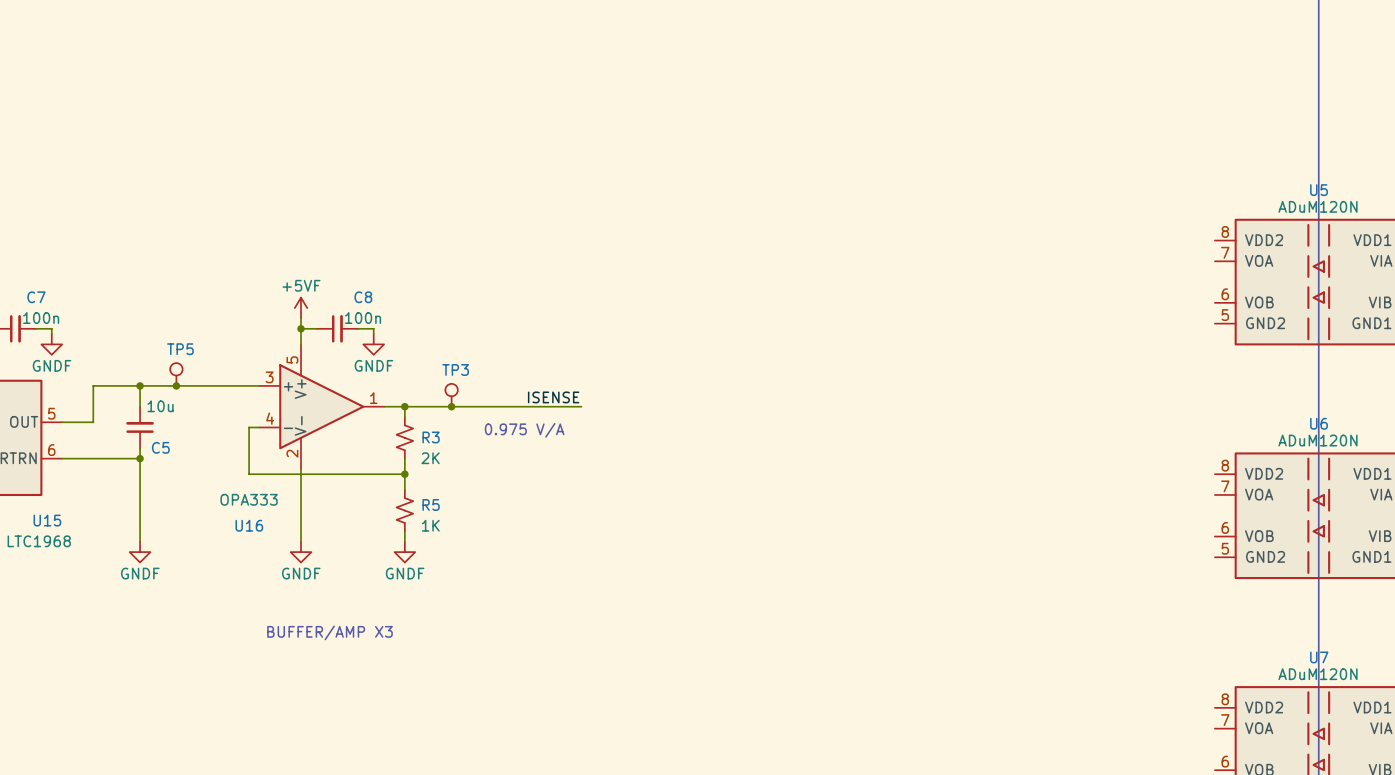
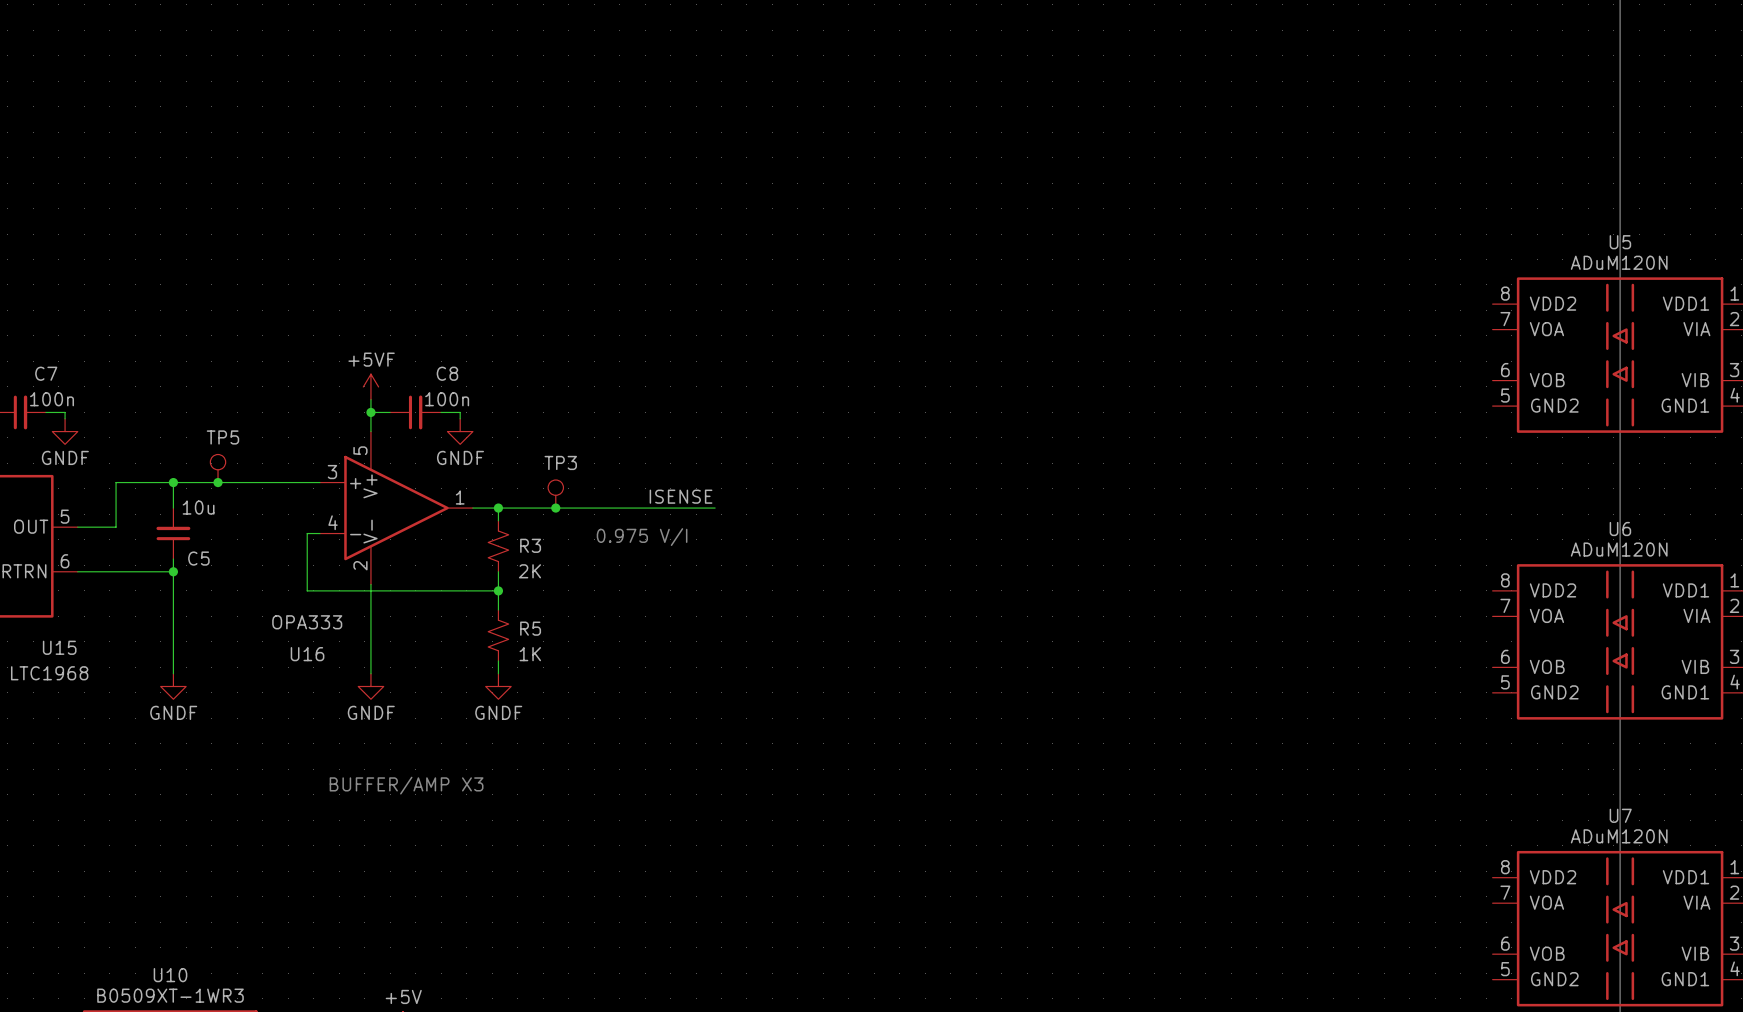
text: 0.975 V/A (524, 430) -> 0.975 V/I (642, 537)

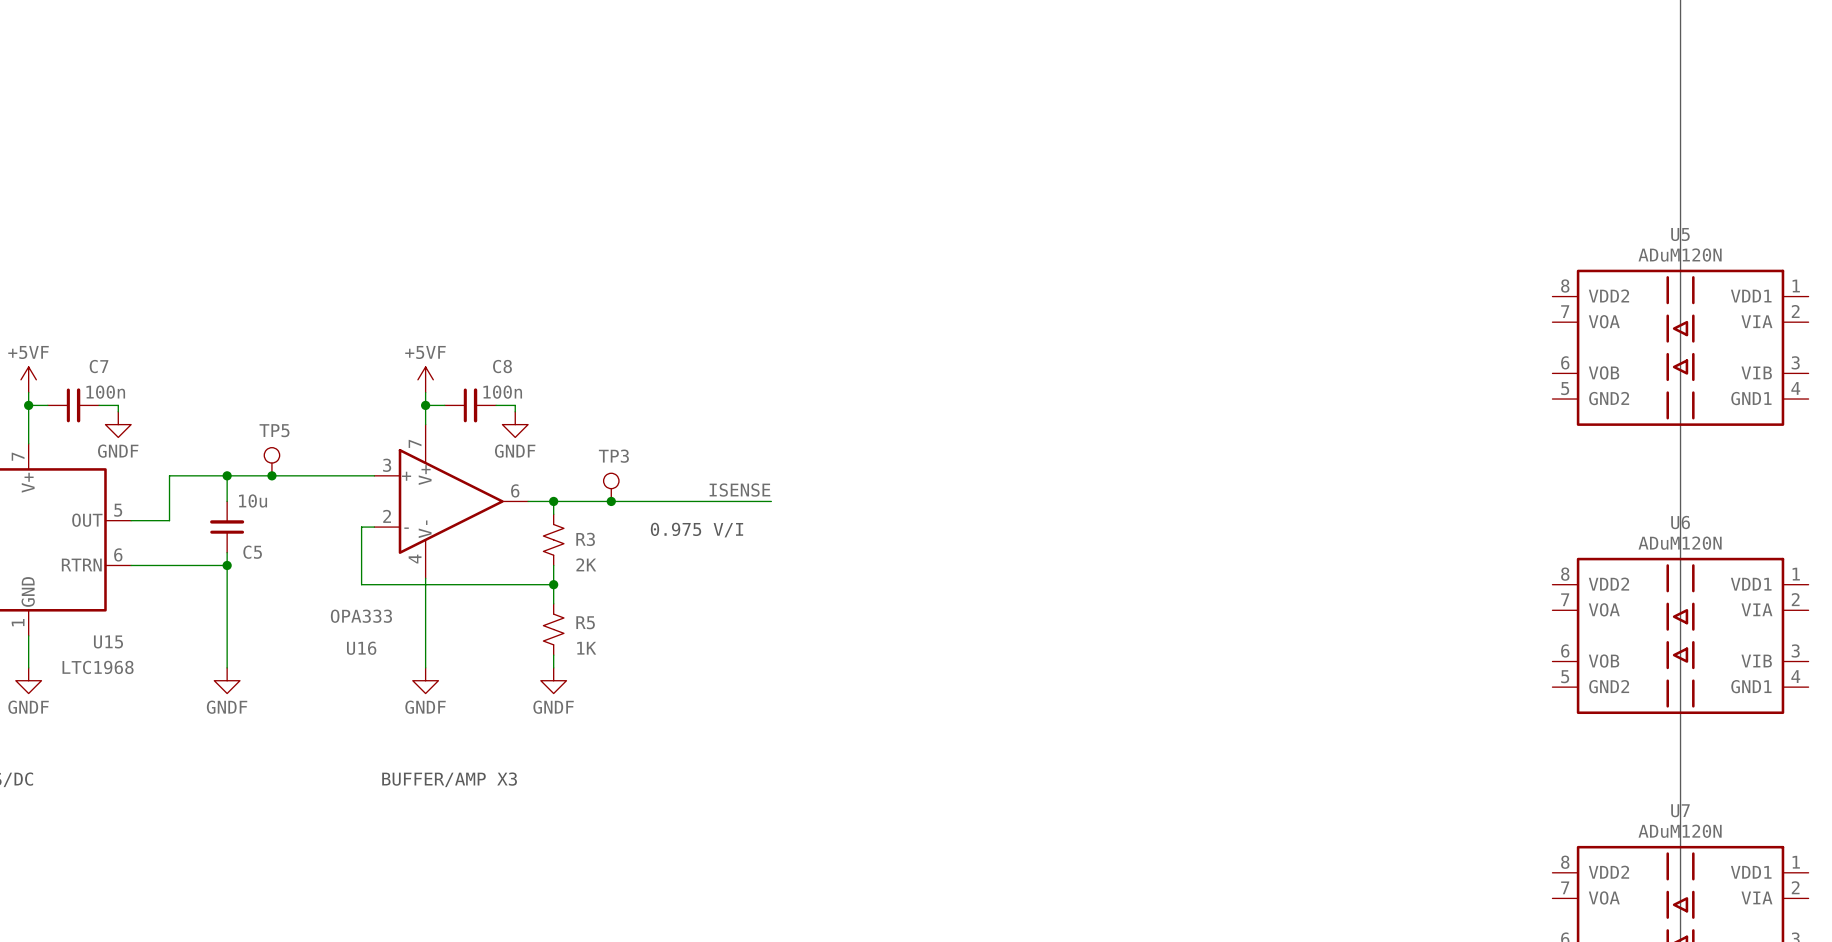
U16 pin number: 5 (360, 450) -> 7 (415, 443)
U16 pin number: 1 (460, 497) -> 6 (515, 490)
U16 pin number: 4 (333, 522) -> 2 (387, 516)
U16 pin number: 2 (360, 565) -> 4 (415, 559)

